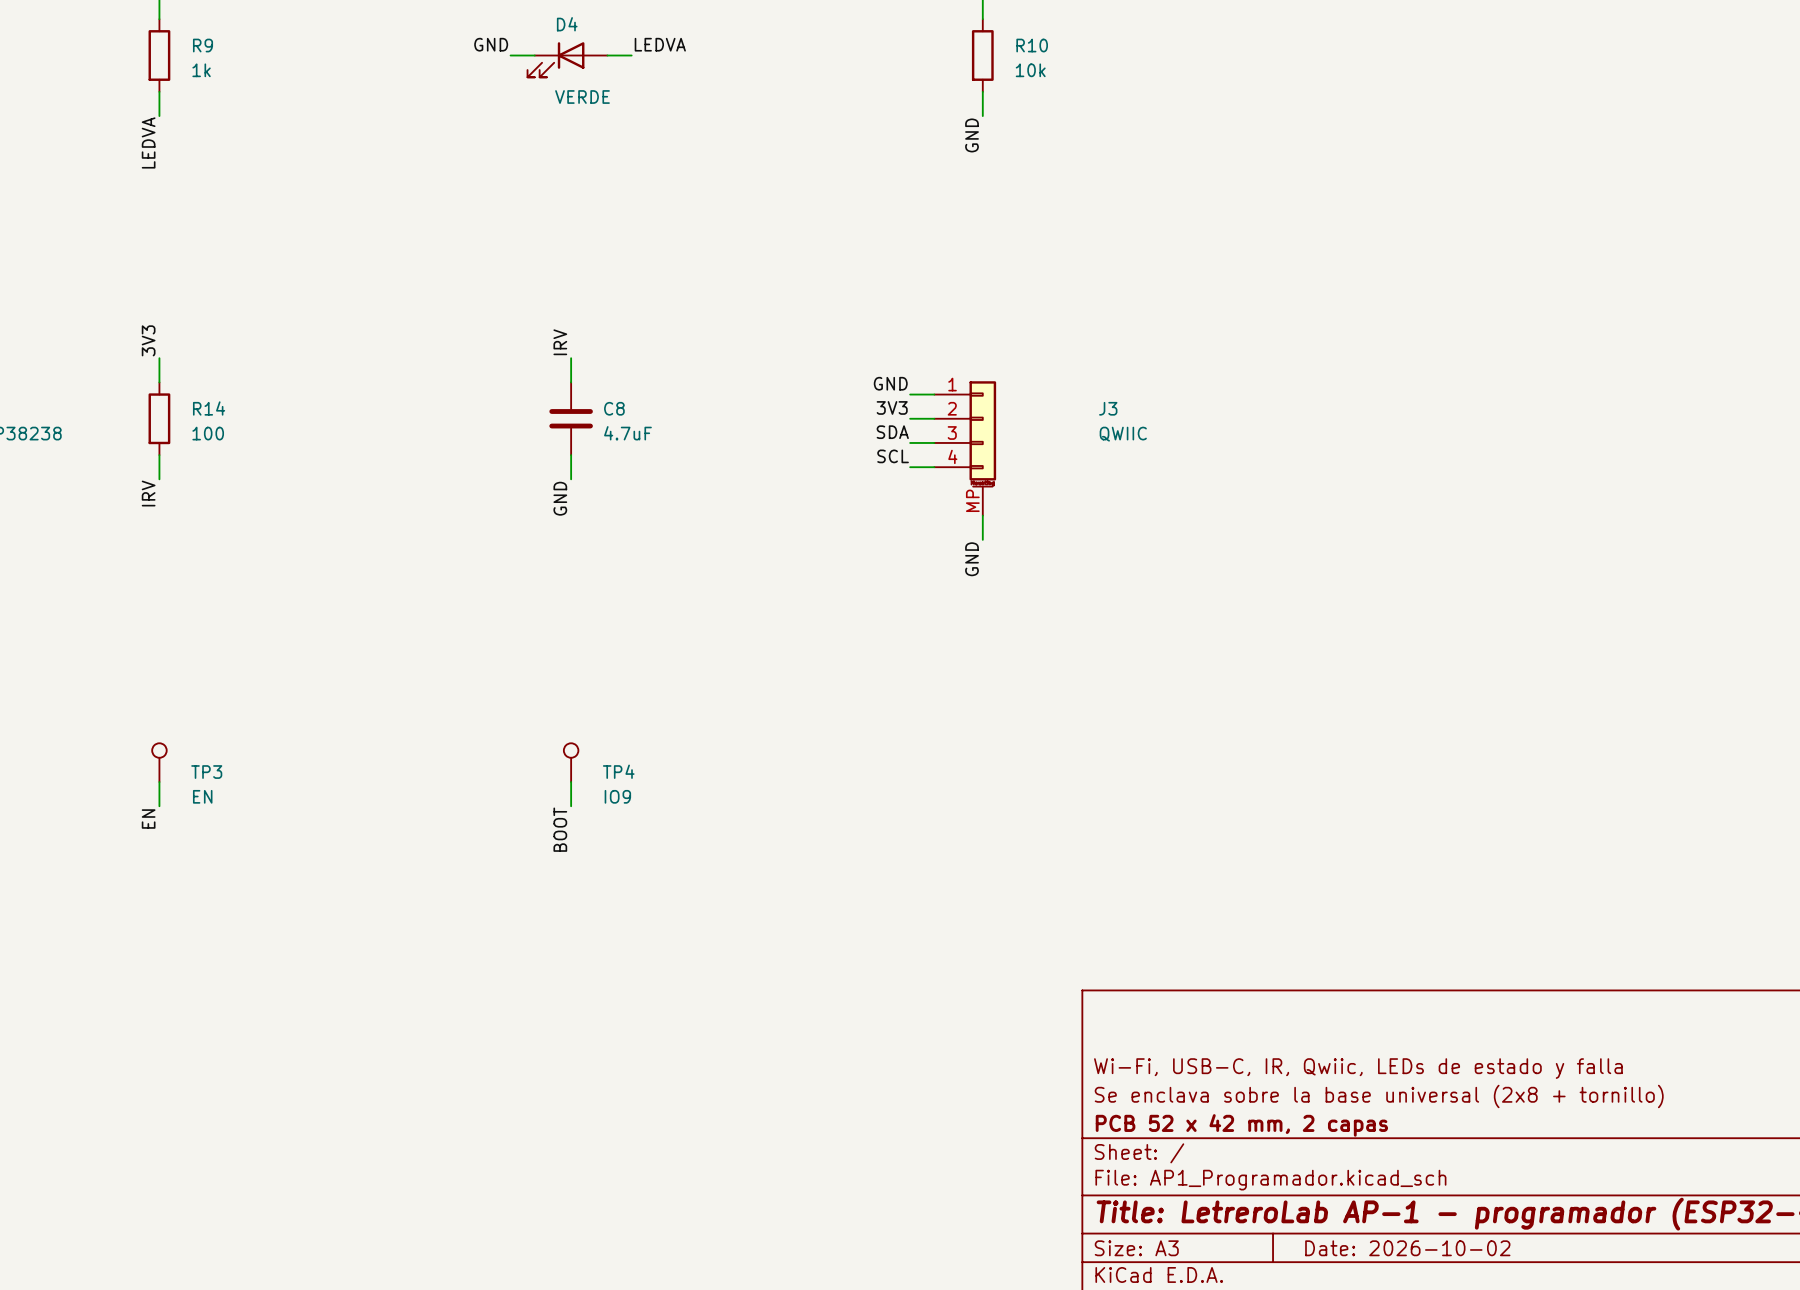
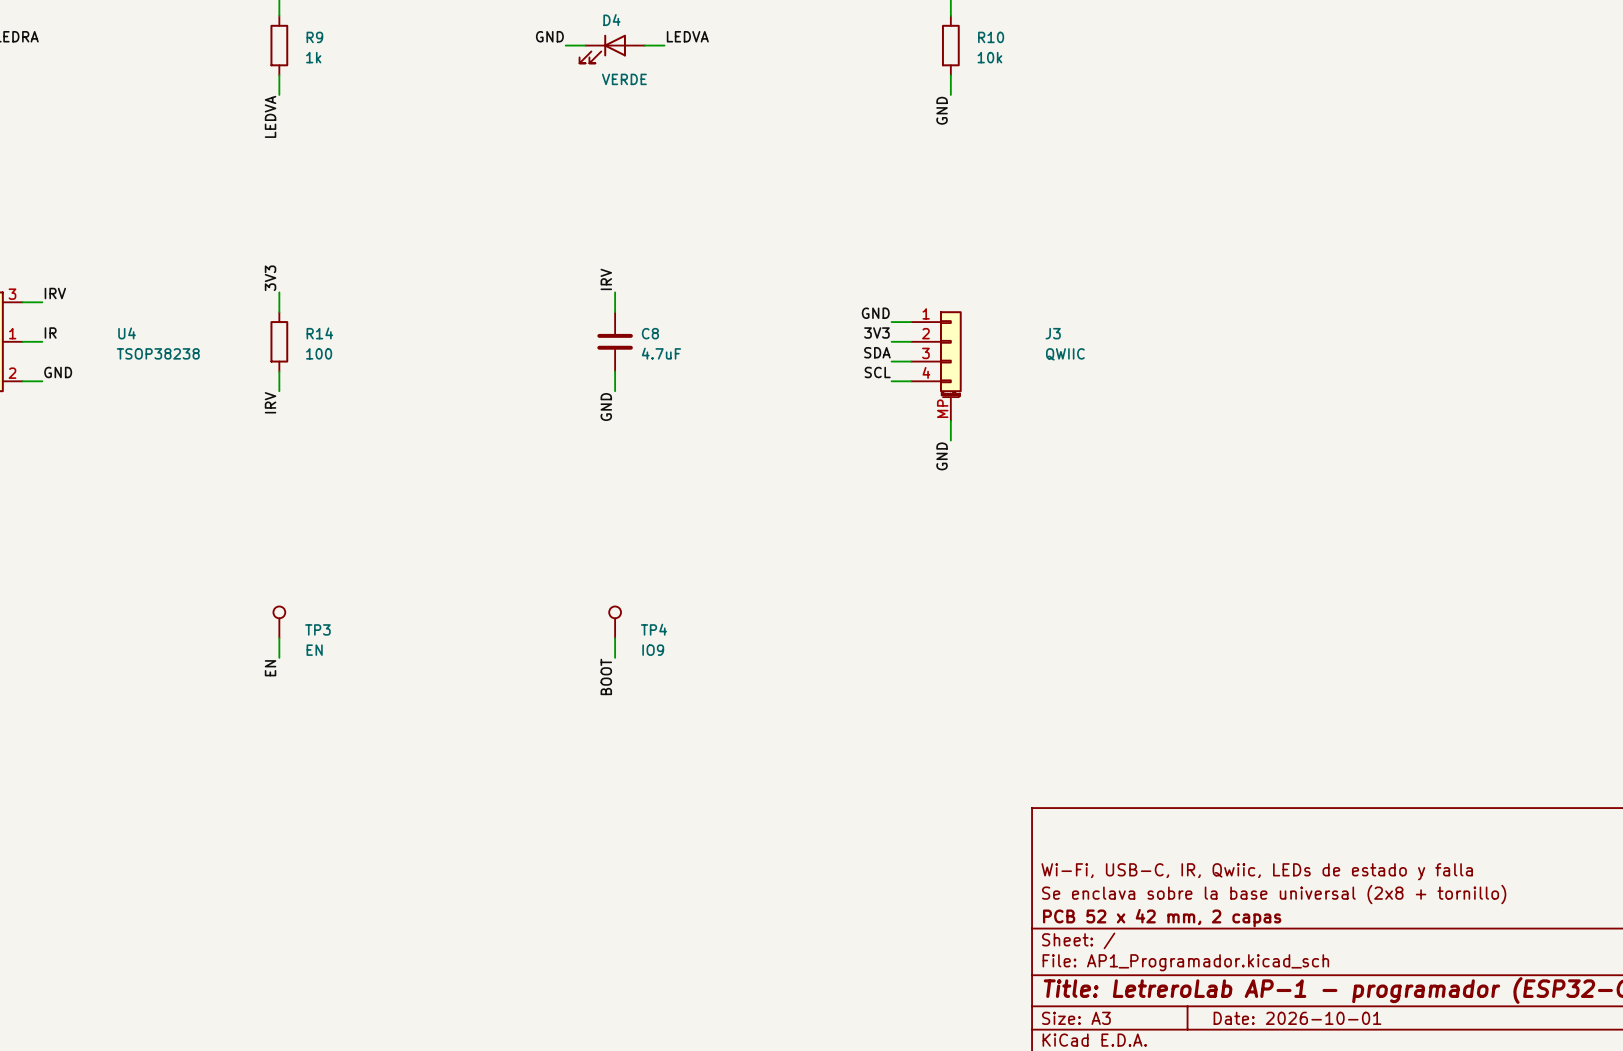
title block: Date: 2026-10-02 (1407, 1248) -> Date: 2026-10-01 (1297, 1018)

